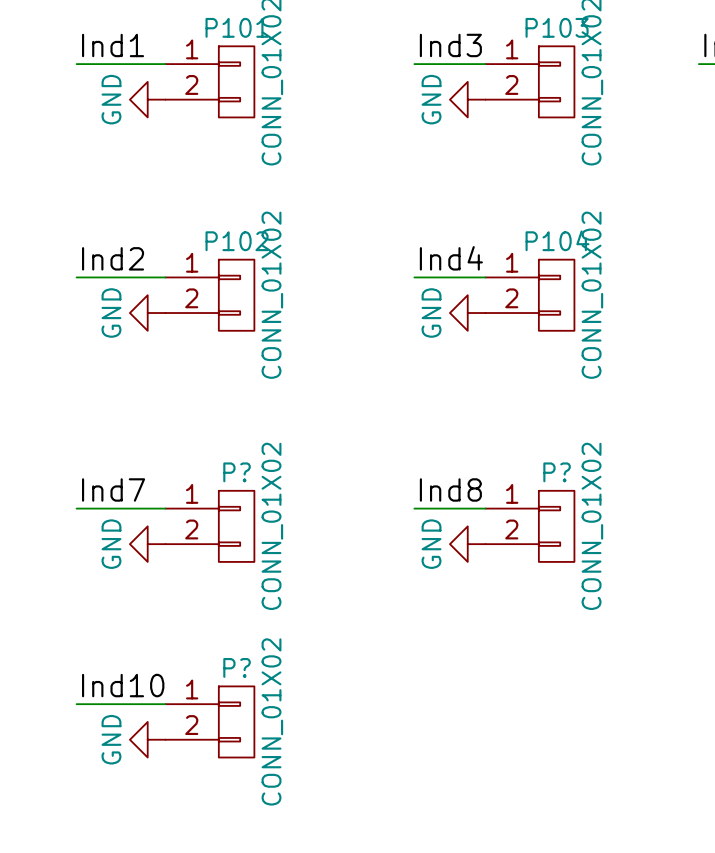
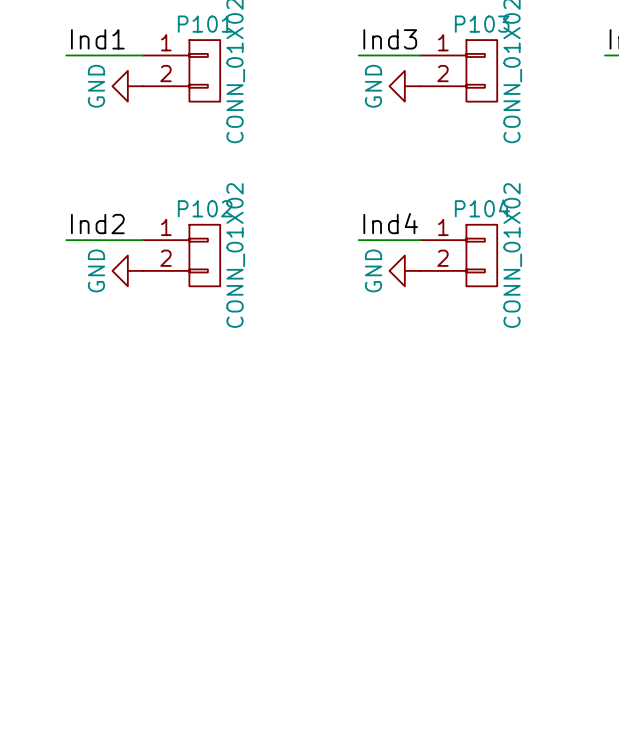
label: Ind7 (113, 489) -> none
label: Ind8 (450, 489) -> none
wire: (76, 508) (165, 508) -> none
wire: (414, 508) (485, 508) -> none
P?: CONN_01X02 (209, 526) -> none
P?: CONN_01X02 (529, 526) -> none
power symbol: GND (147, 544) -> none
power symbol: GND (467, 544) -> none
label: Ind10 (123, 685) -> none
wire: (76, 704) (165, 704) -> none
P?: CONN_01X02 (209, 721) -> none
power symbol: GND (147, 739) -> none

